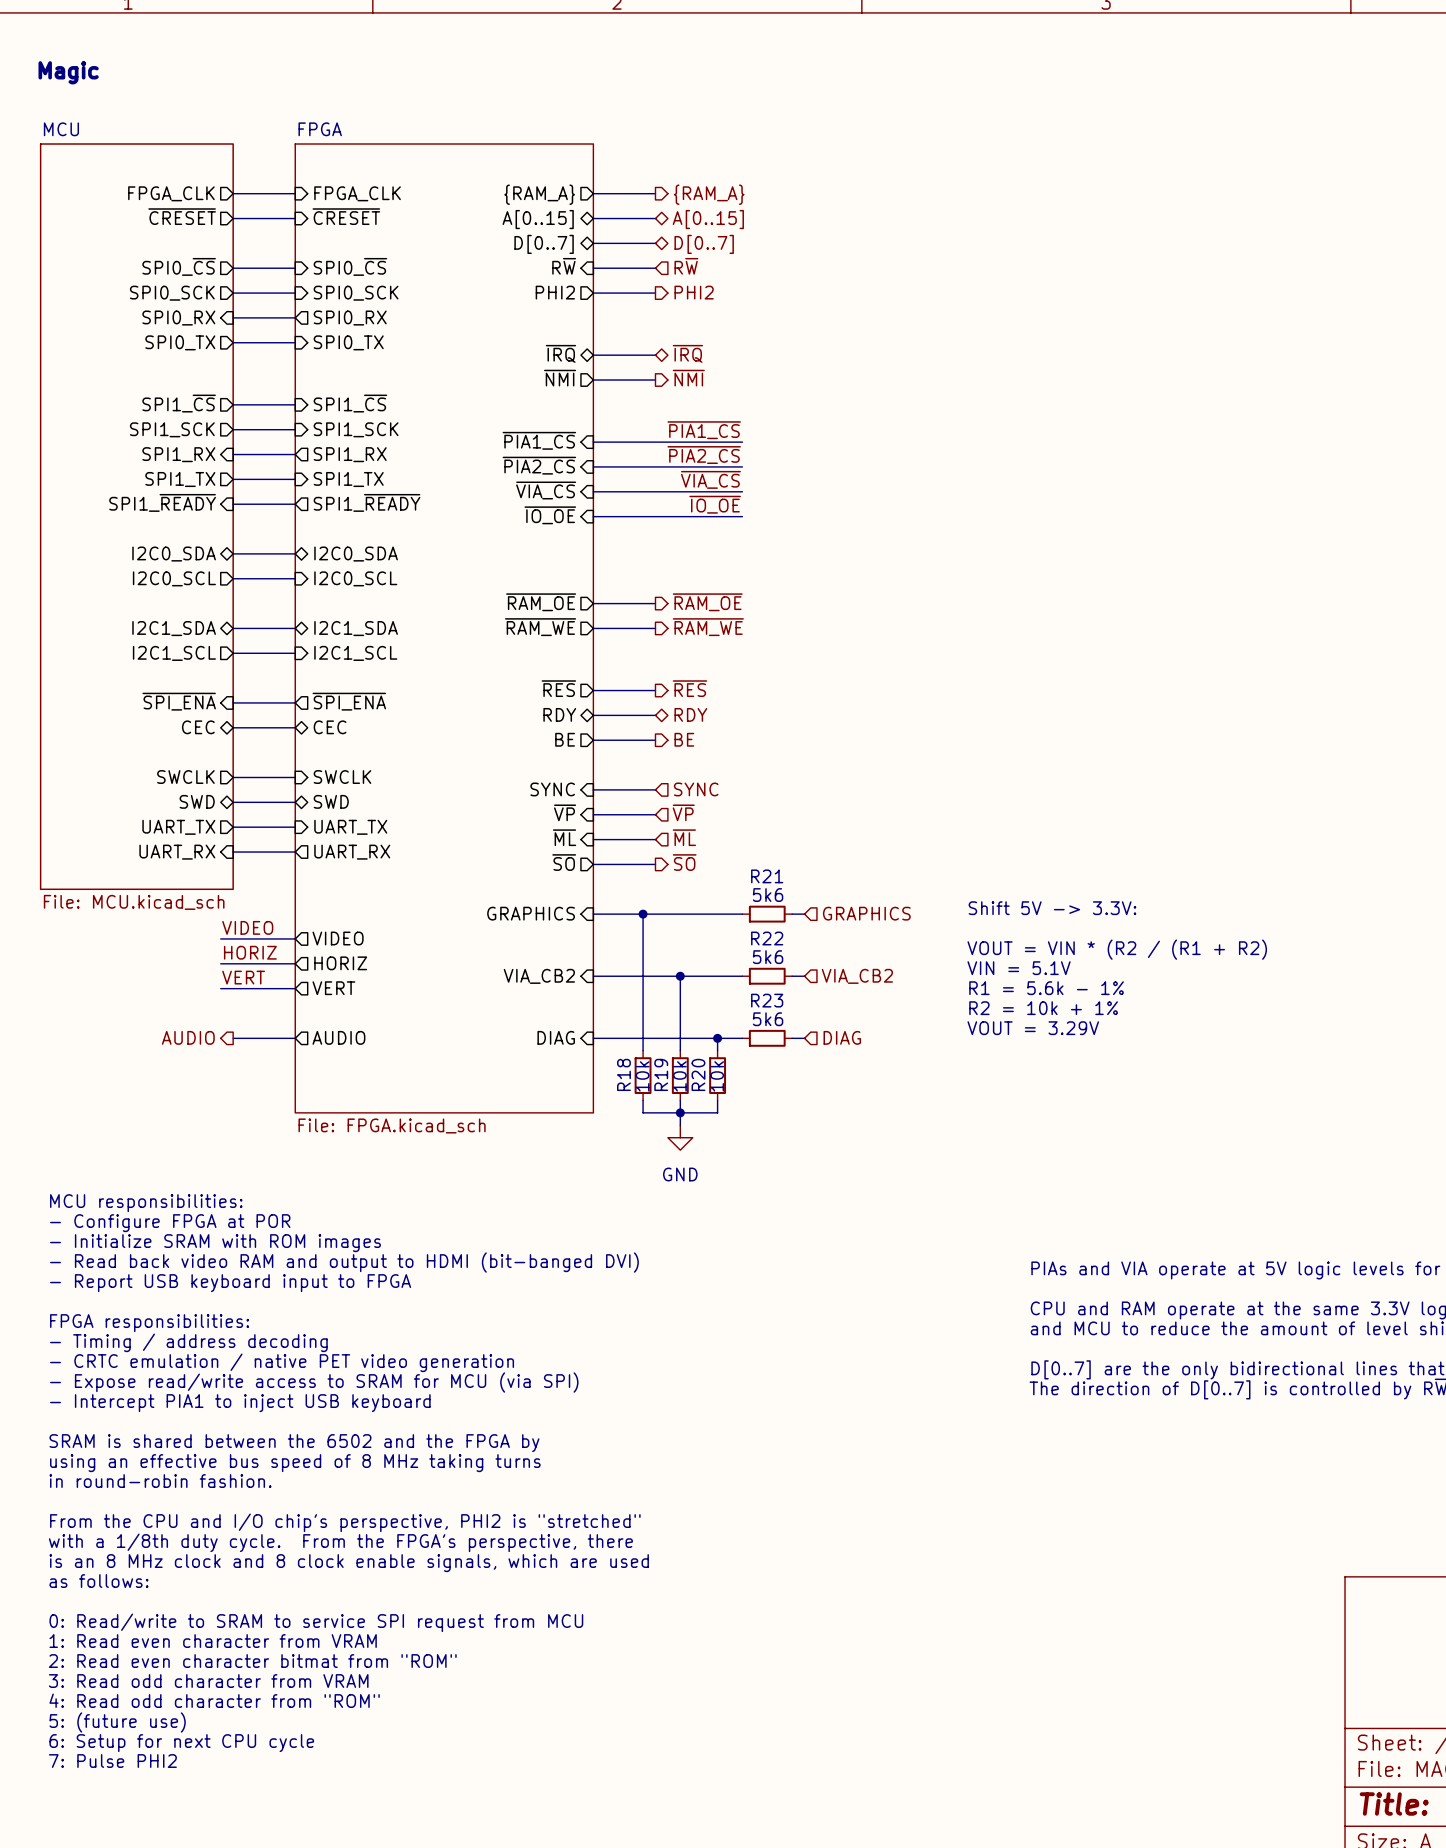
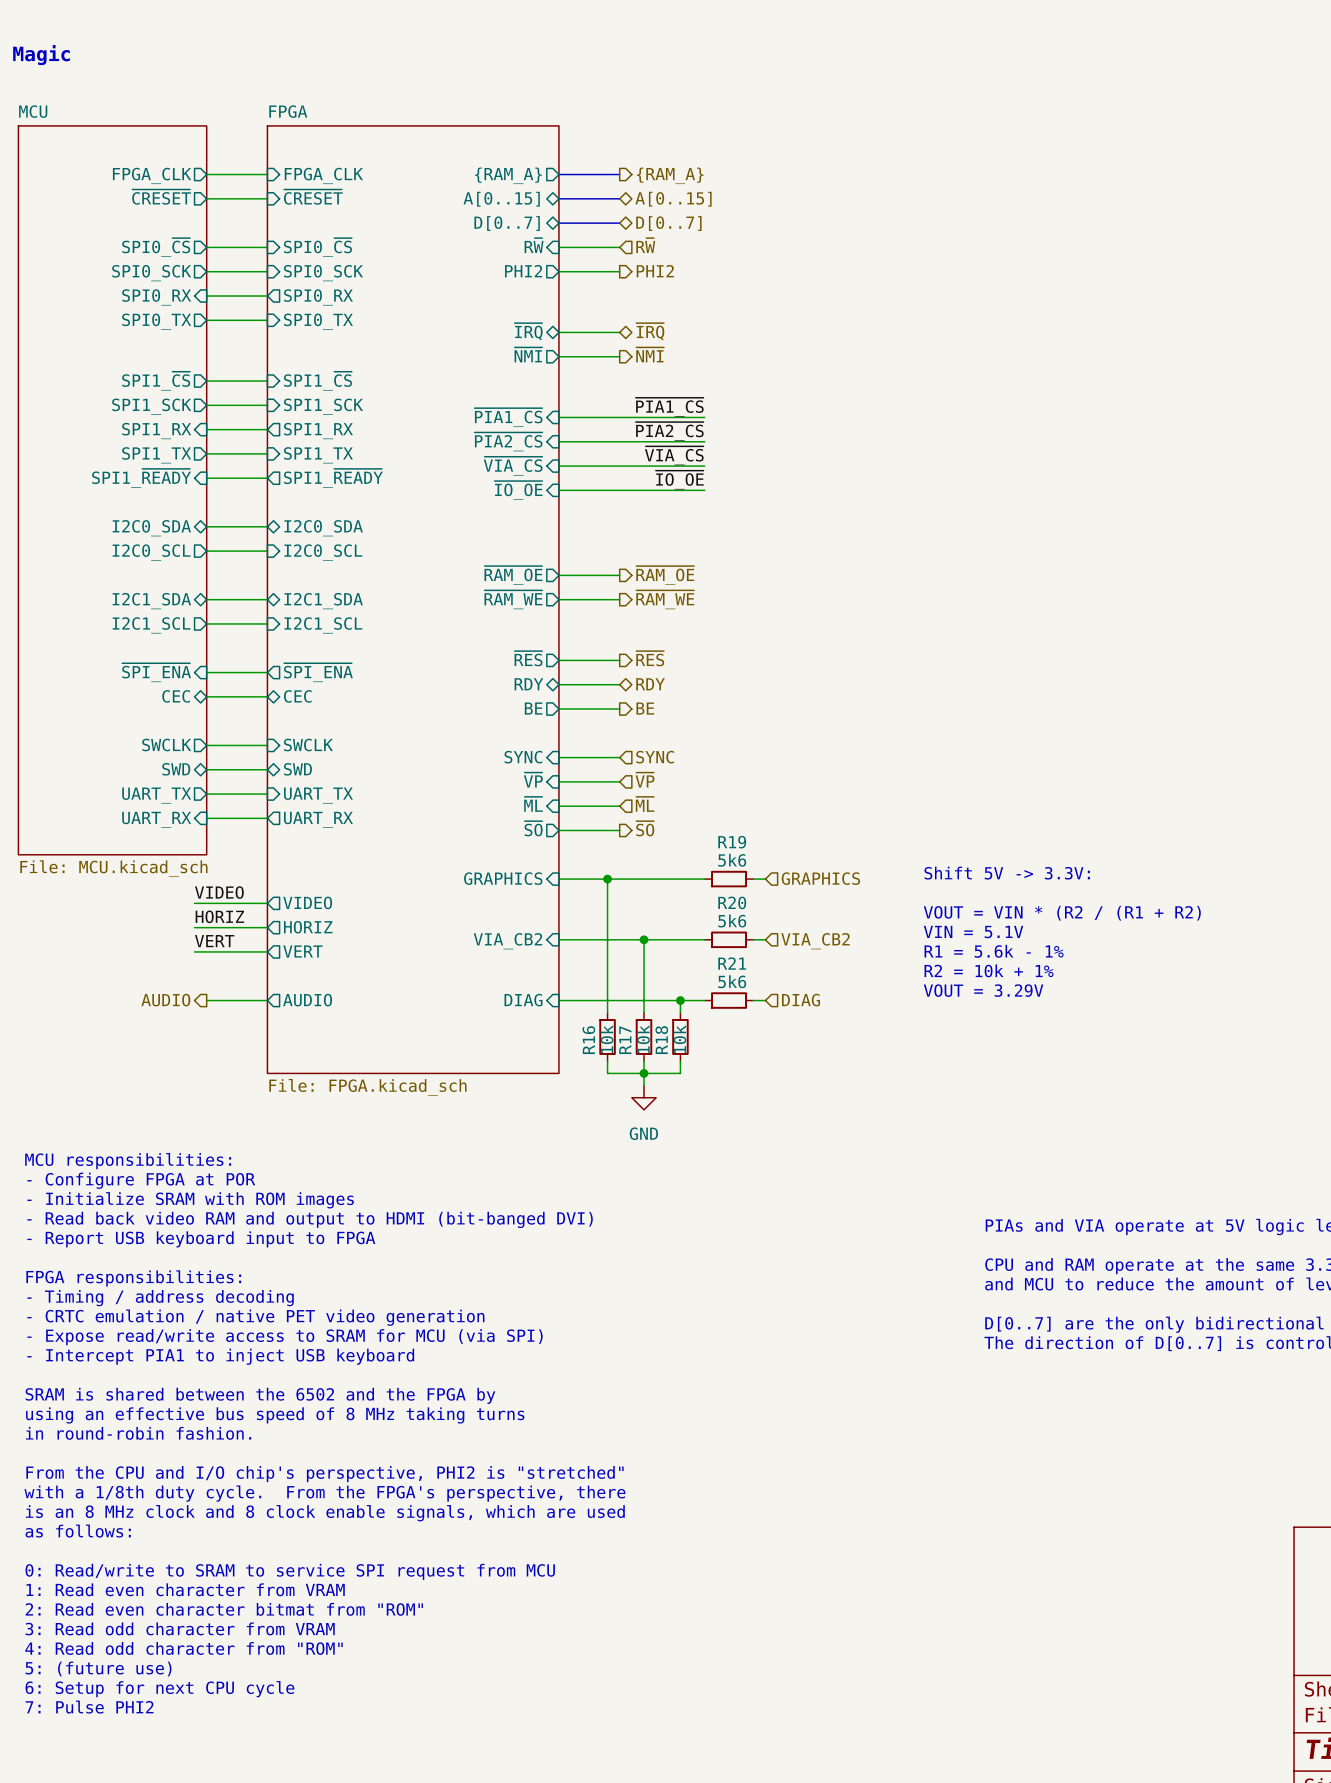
R21 name: R21 (767, 876) -> R19 (732, 842)
R22 name: R22 (767, 938) -> R20 (732, 902)
R23 name: R23 (767, 1000) -> R21 (732, 963)
R18 name: R18 (623, 1074) -> R16 (588, 1040)
R19 name: R19 (661, 1074) -> R17 (625, 1040)
R20 name: R20 (698, 1074) -> R18 (661, 1040)

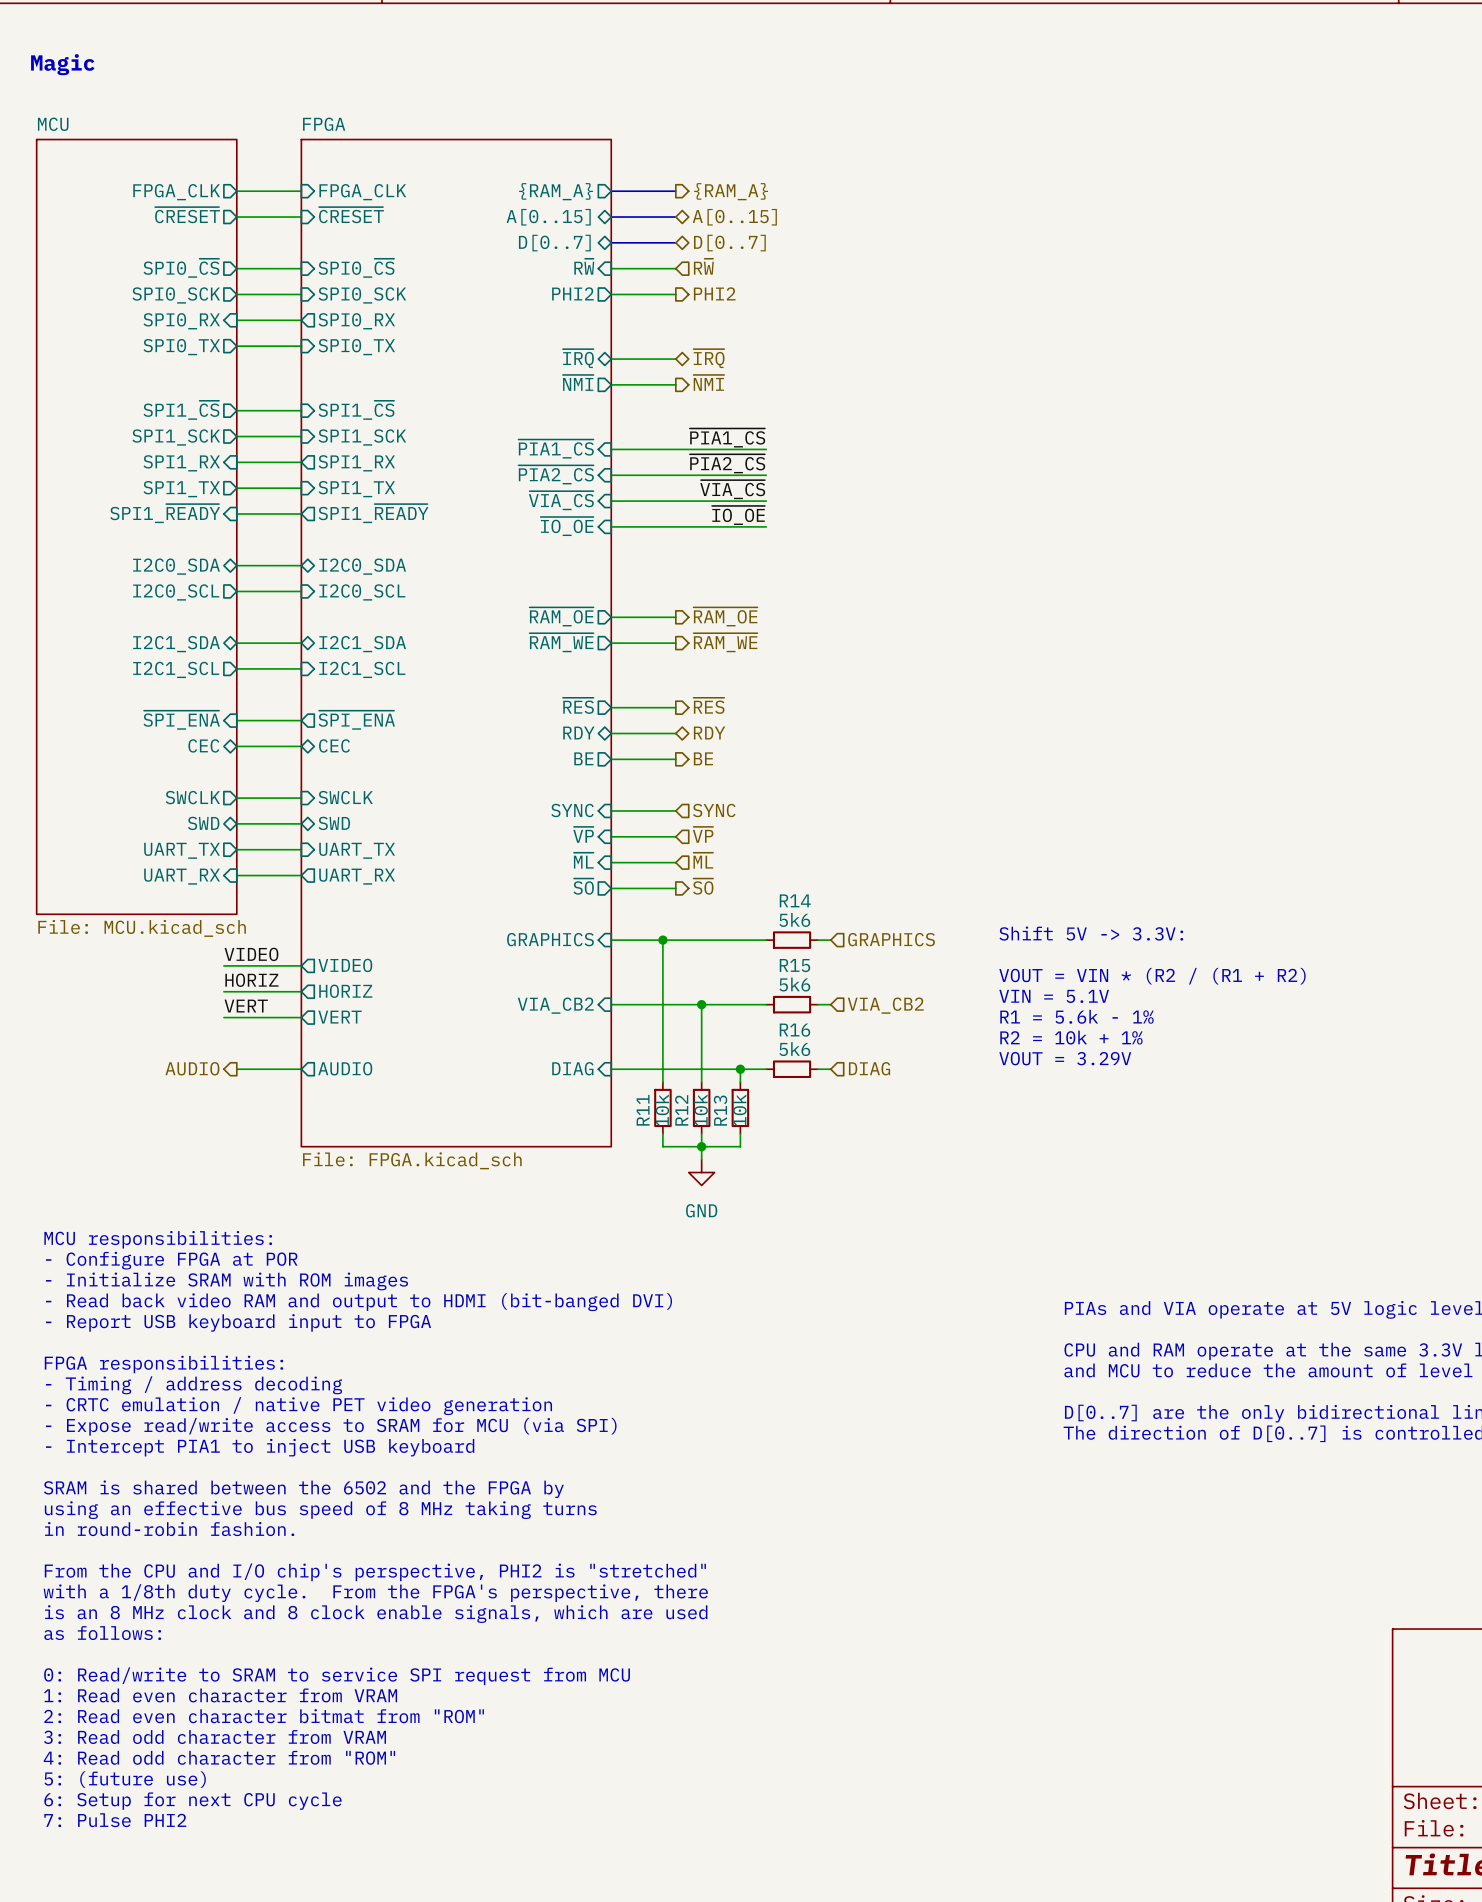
R19 name: R19 (732, 842) -> R14 (795, 900)
R20 name: R20 (732, 902) -> R15 (794, 965)
R21 name: R21 (732, 963) -> R16 (795, 1030)
R16 name: R16 (588, 1040) -> R11 (643, 1110)
R17 name: R17 (625, 1040) -> R12 (681, 1110)
R18 name: R18 (661, 1040) -> R13 (720, 1110)

